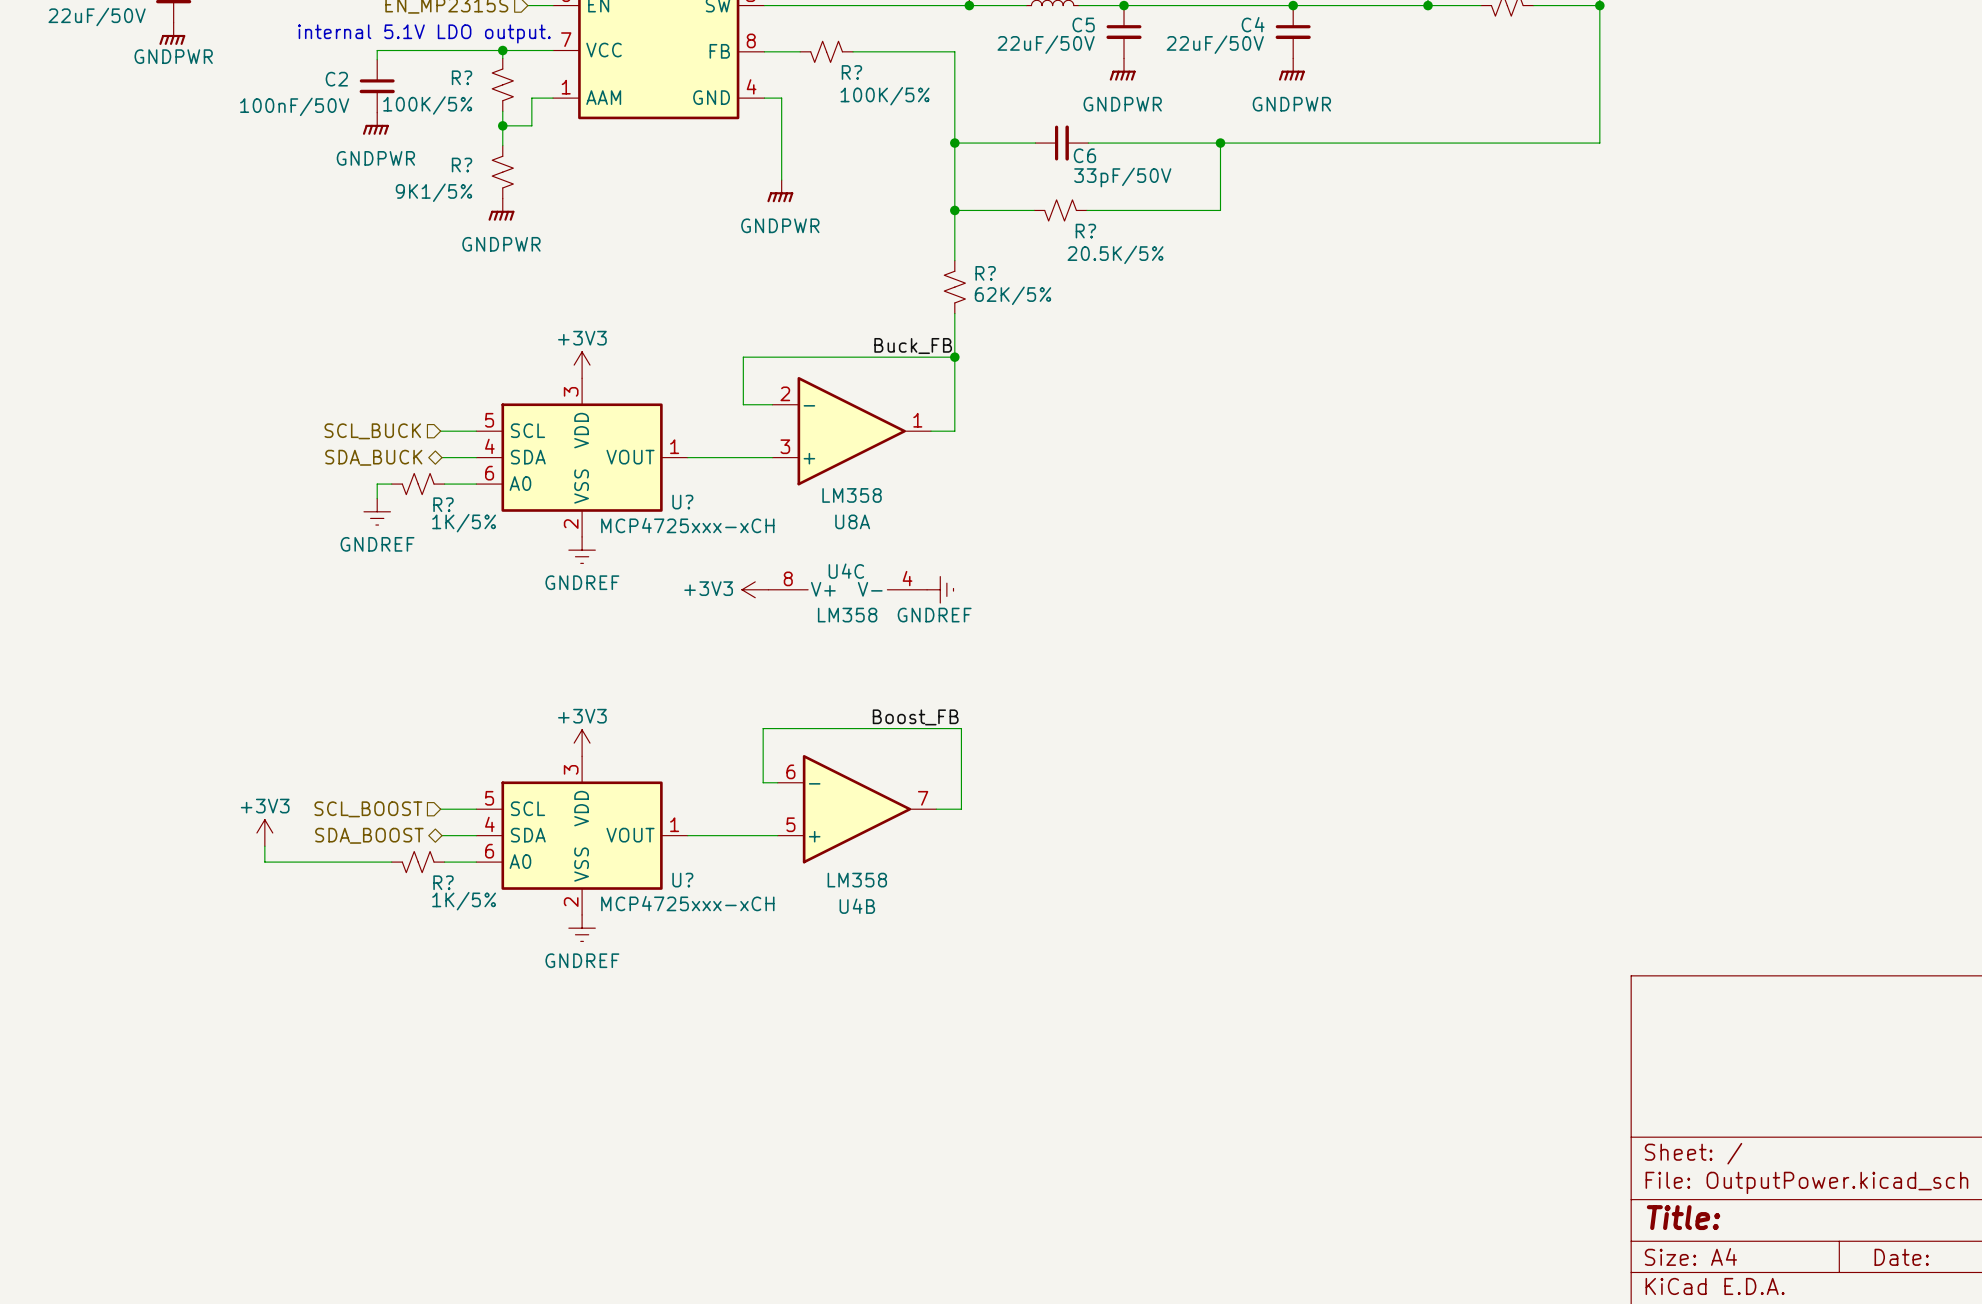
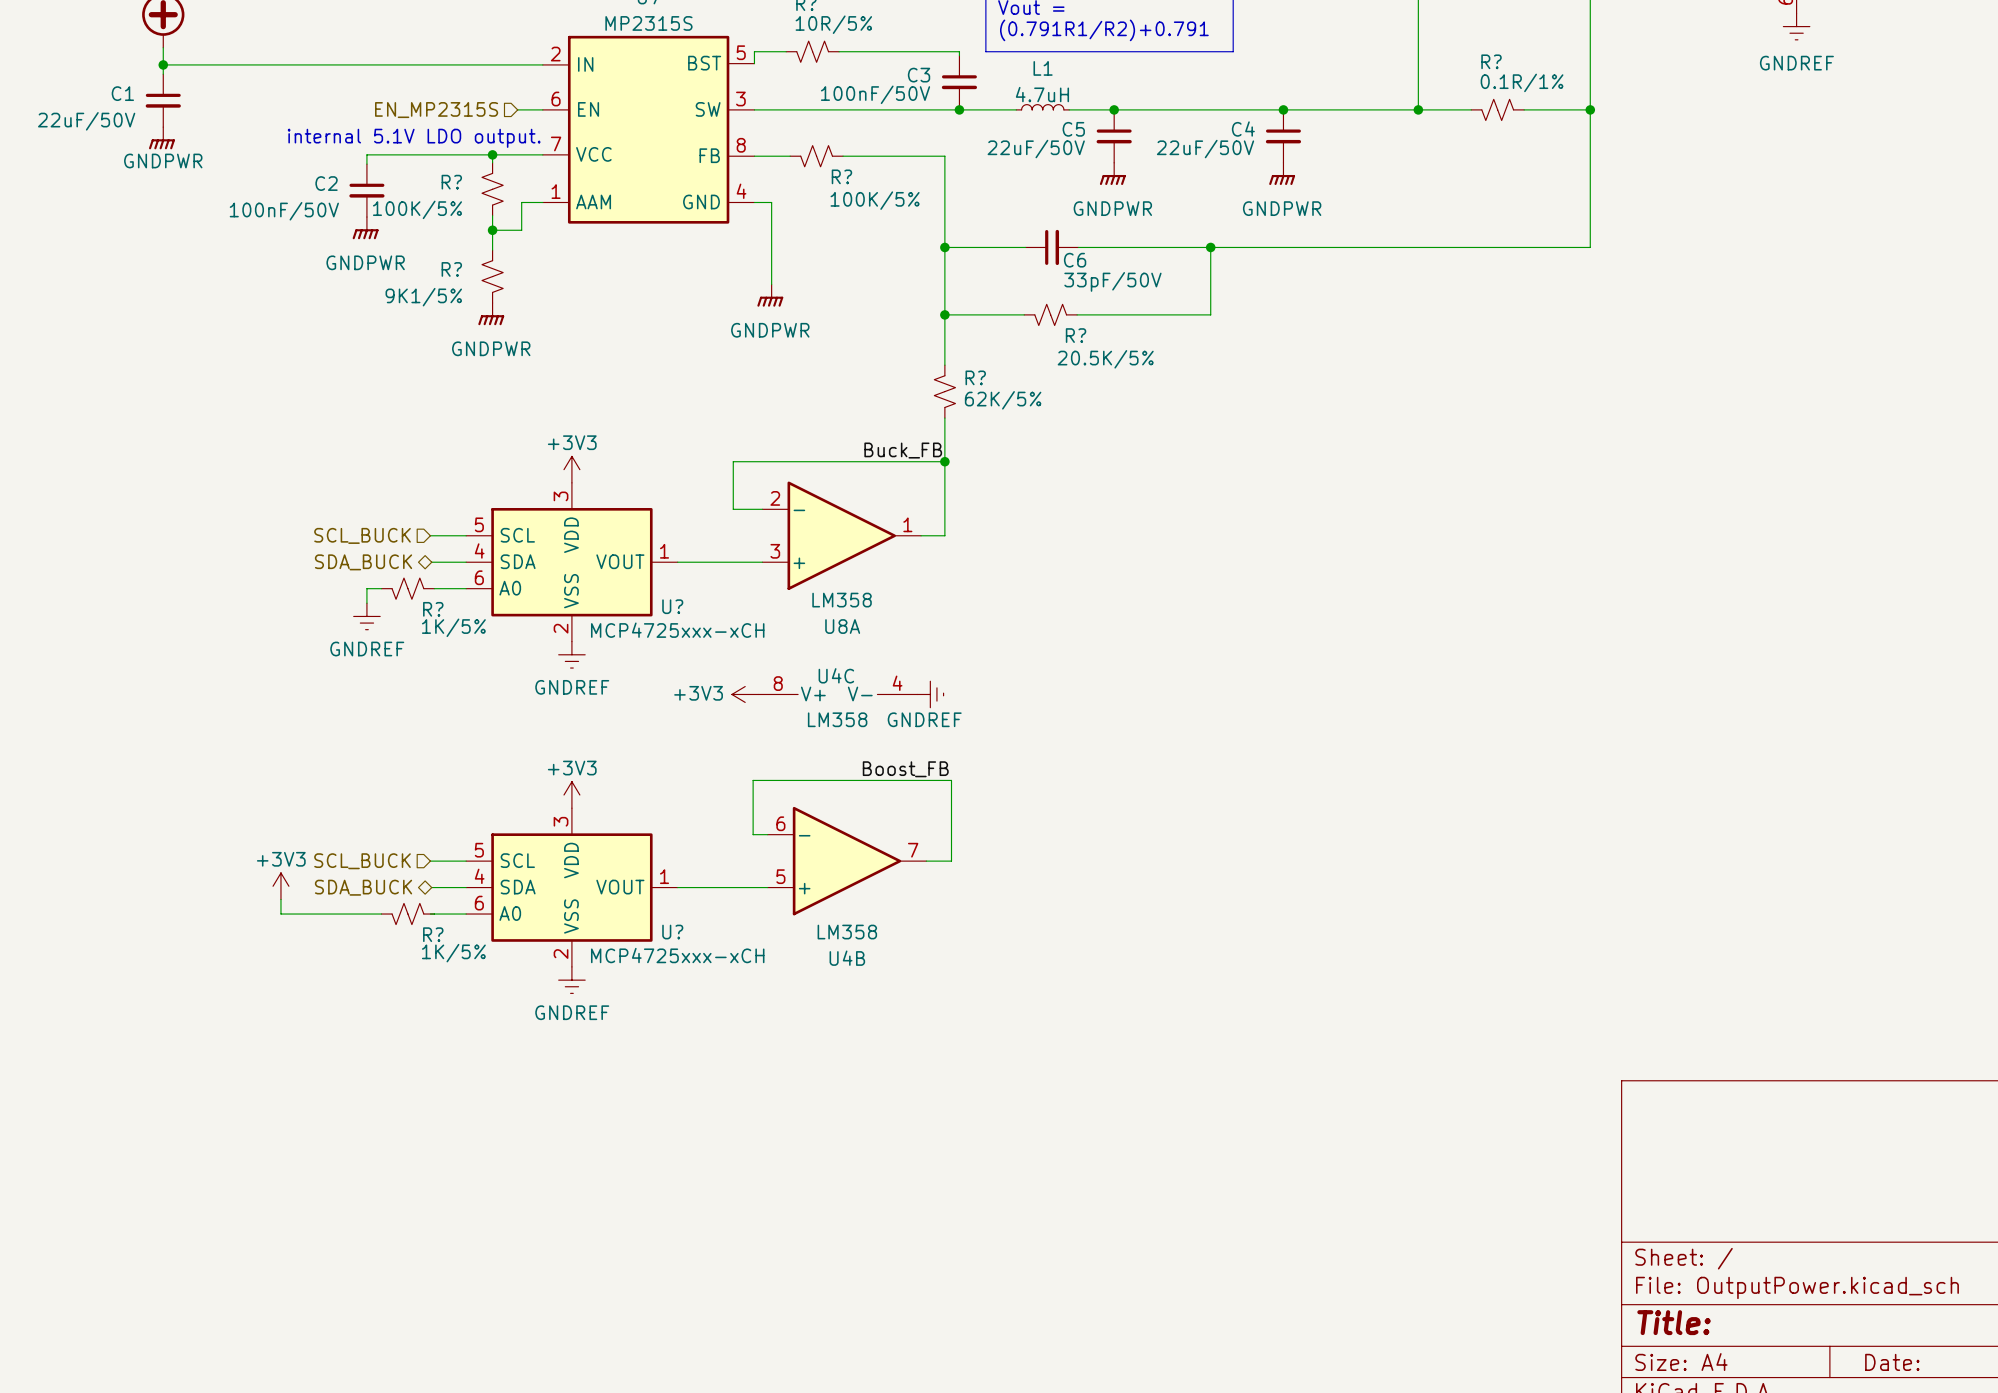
label position: Boost_FB (915, 717) -> Boost_FB (905, 769)
wire: (763, 728) (961, 728) -> (753, 833) (753, 780) (951, 780) (951, 833)
wire: (763, 729) (763, 782) -> (753, 834) (767, 834)
power symbol position: +3V3 (582, 743) -> +3V3 (571, 794)
hierarchical label: none -> SCL_BUCK (362, 861)
wire: none -> (430, 861) (466, 861)
wire: (961, 756) (961, 809) (936, 809) -> (951, 861) (926, 861)
hierarchical label: none -> SDA_BUCK (363, 887)
wire: none -> (677, 887) (753, 887)
wire: none -> (280, 899) (280, 914) (381, 914)
hierarchical label: SCL_BOOST (368, 809) -> none
U4B position: (857, 809) -> (847, 861)
power symbol position: +3V3 (264, 833) -> +3V3 (280, 886)
hierarchical label: SDA_BOOST (369, 835) -> none
wire: (441, 835) (476, 835) -> (431, 887) (466, 887)
U? position: (582, 835) -> (571, 887)
wire: (687, 835) (777, 835) -> none
wire: (264, 846) (264, 862) (391, 862) -> none
R? position: (418, 862) -> (407, 914)
wire: (444, 862) (476, 862) -> none
power symbol position: GNDREF (582, 928) -> GNDREF (571, 980)

